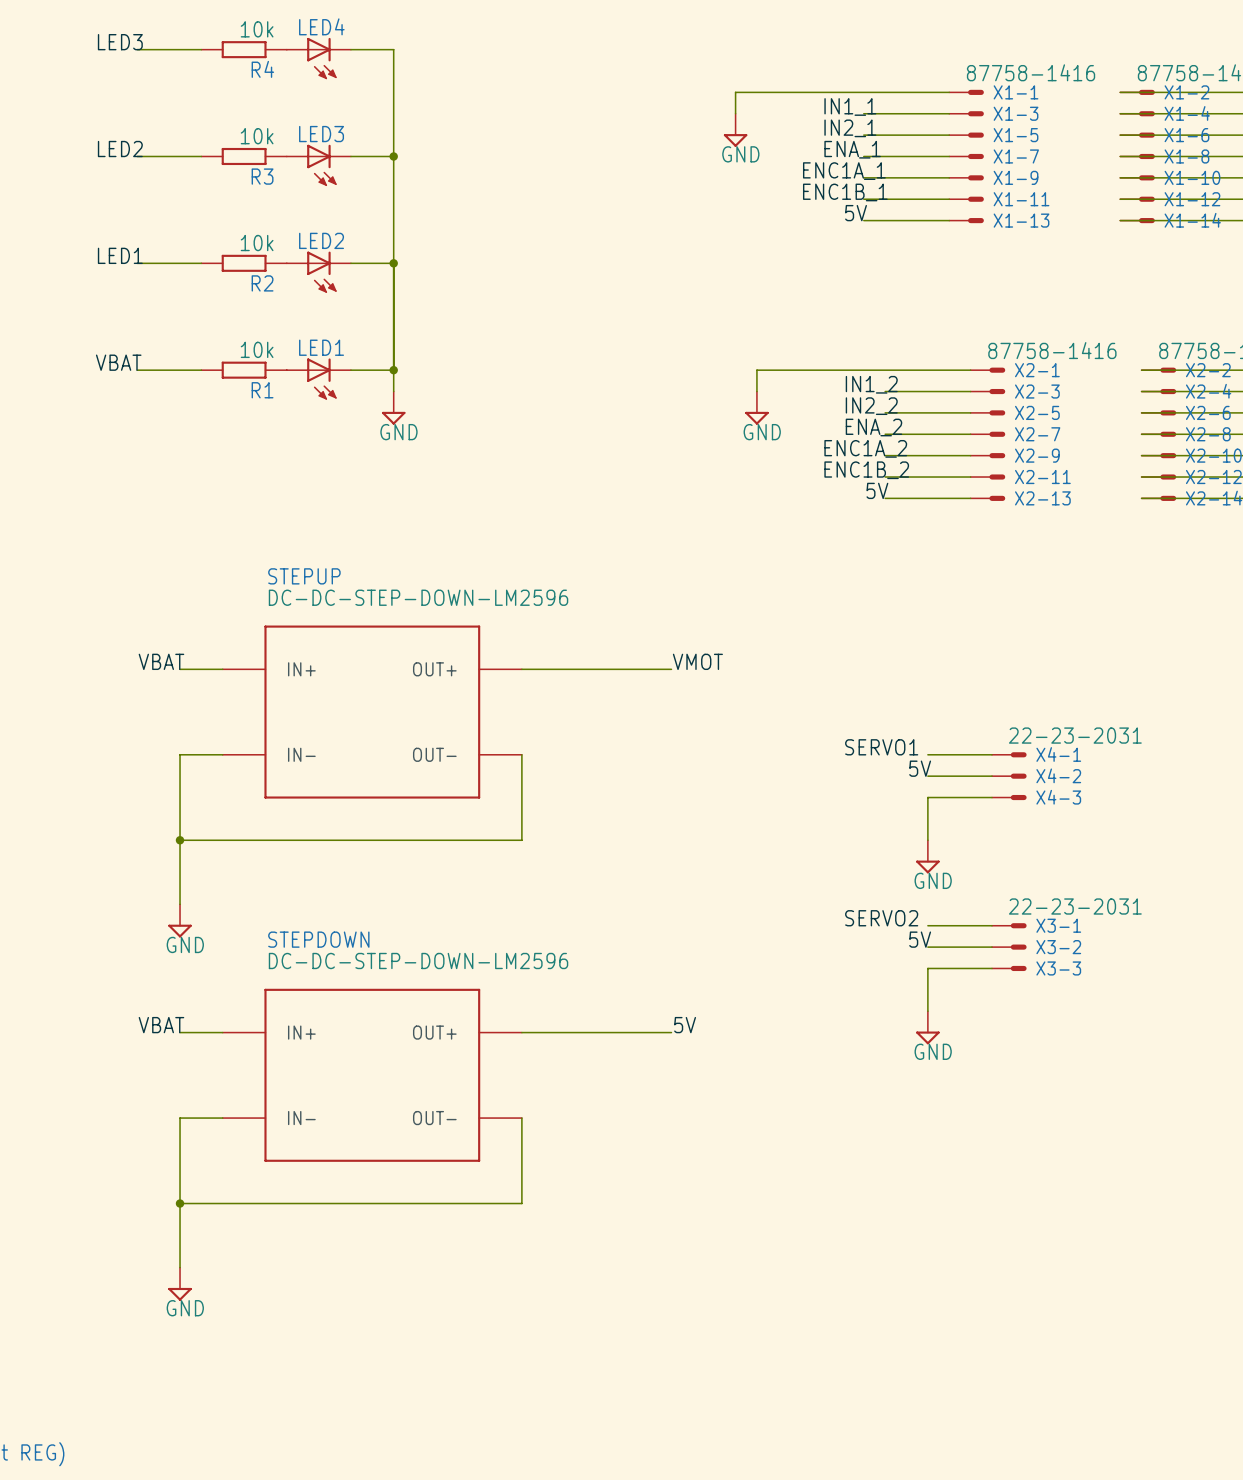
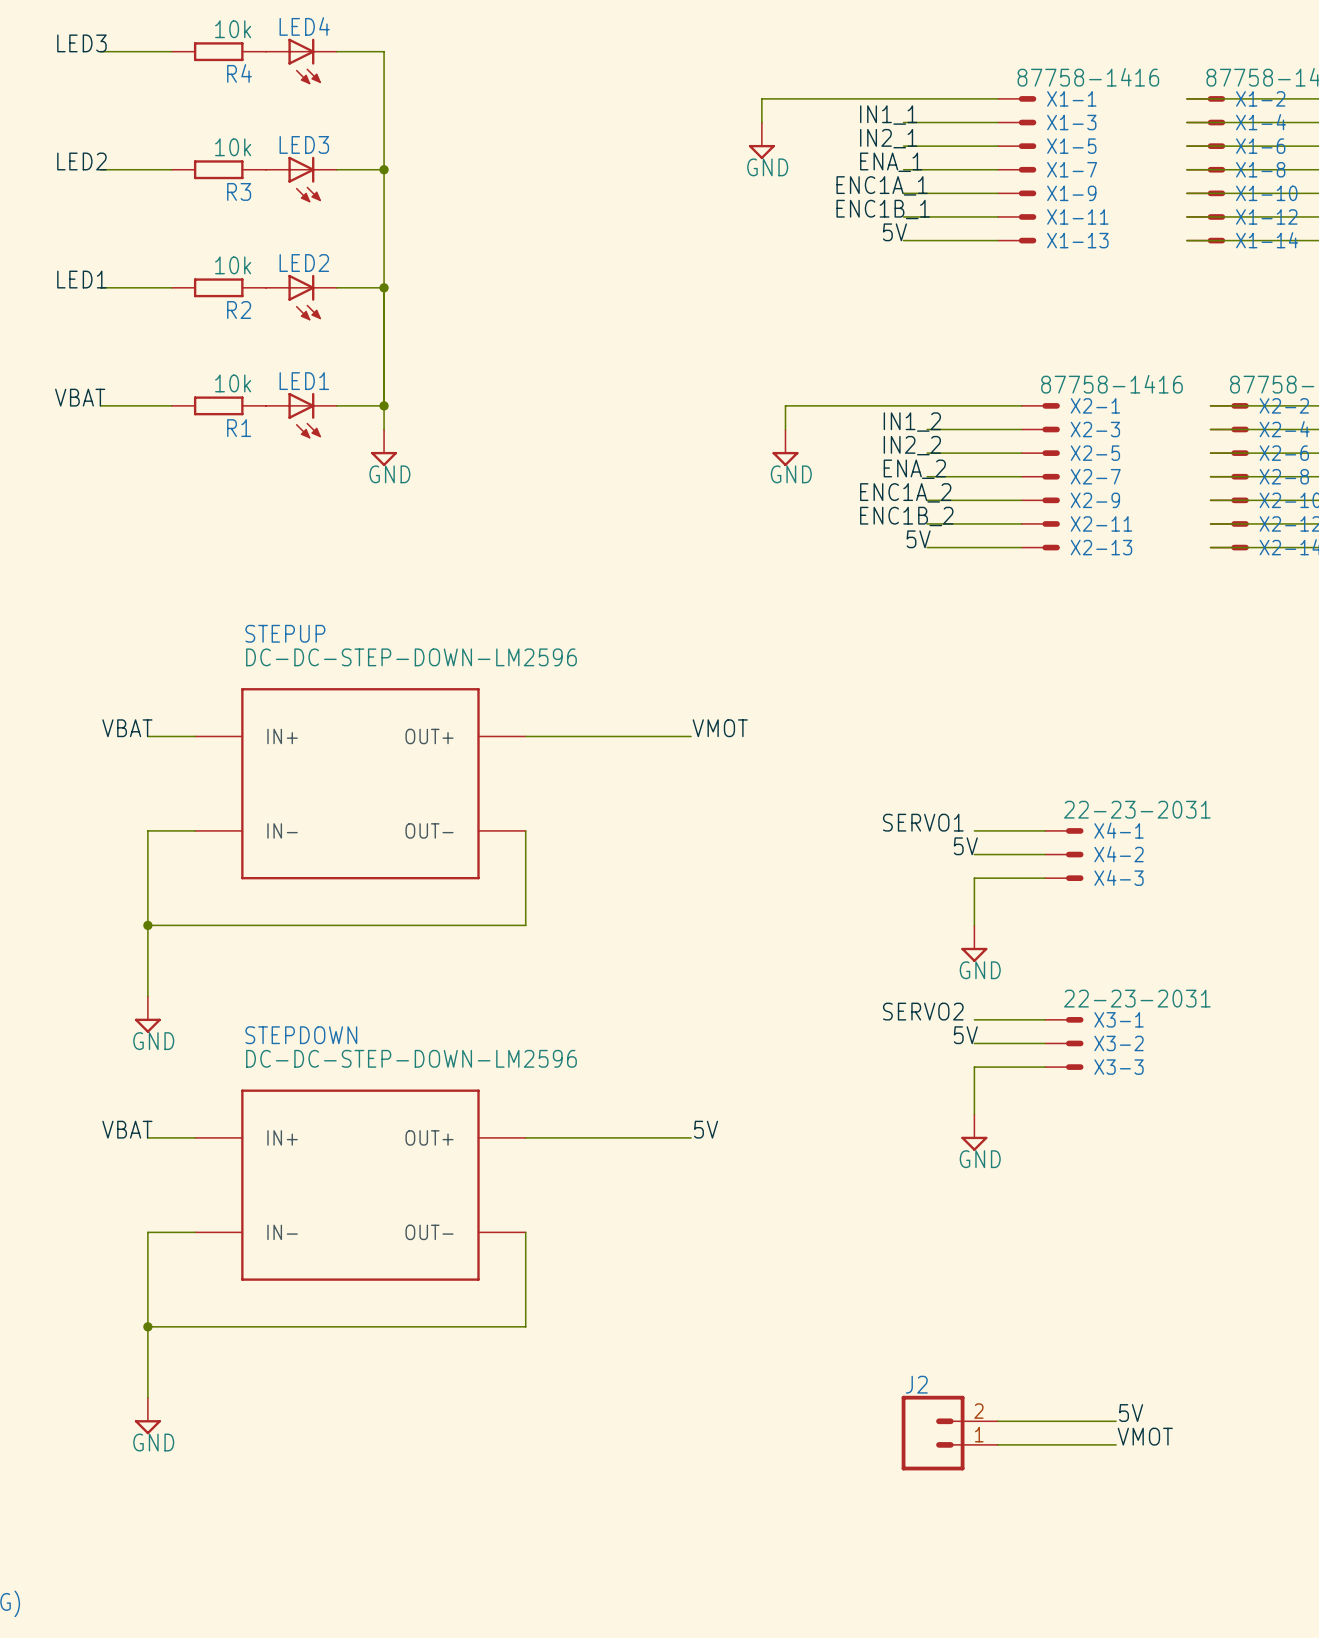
label: none -> 5V (1131, 1413)
wire: none -> (998, 1421) (1116, 1421)
J2: none -> (949, 1433)
label: none -> VMOT (1145, 1436)
wire: none -> (998, 1444) (1116, 1444)

